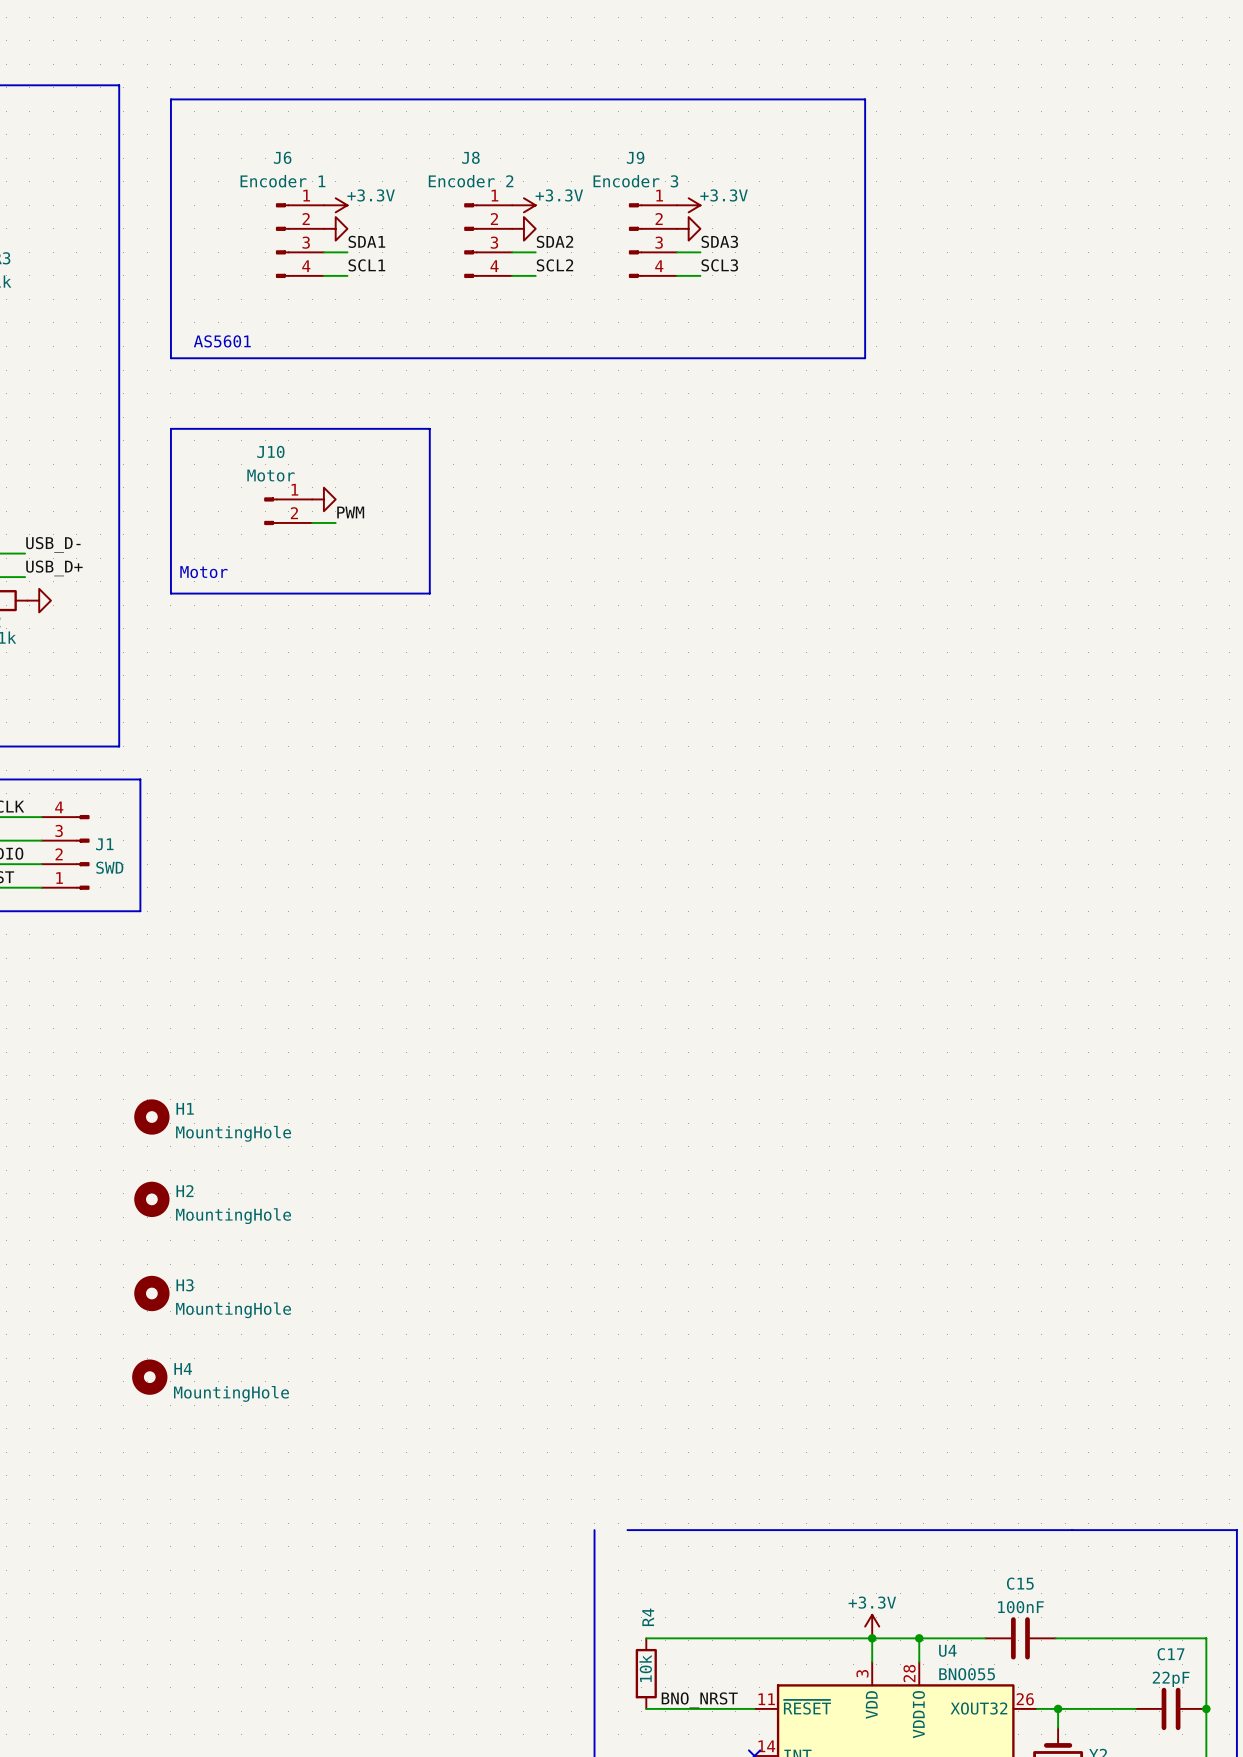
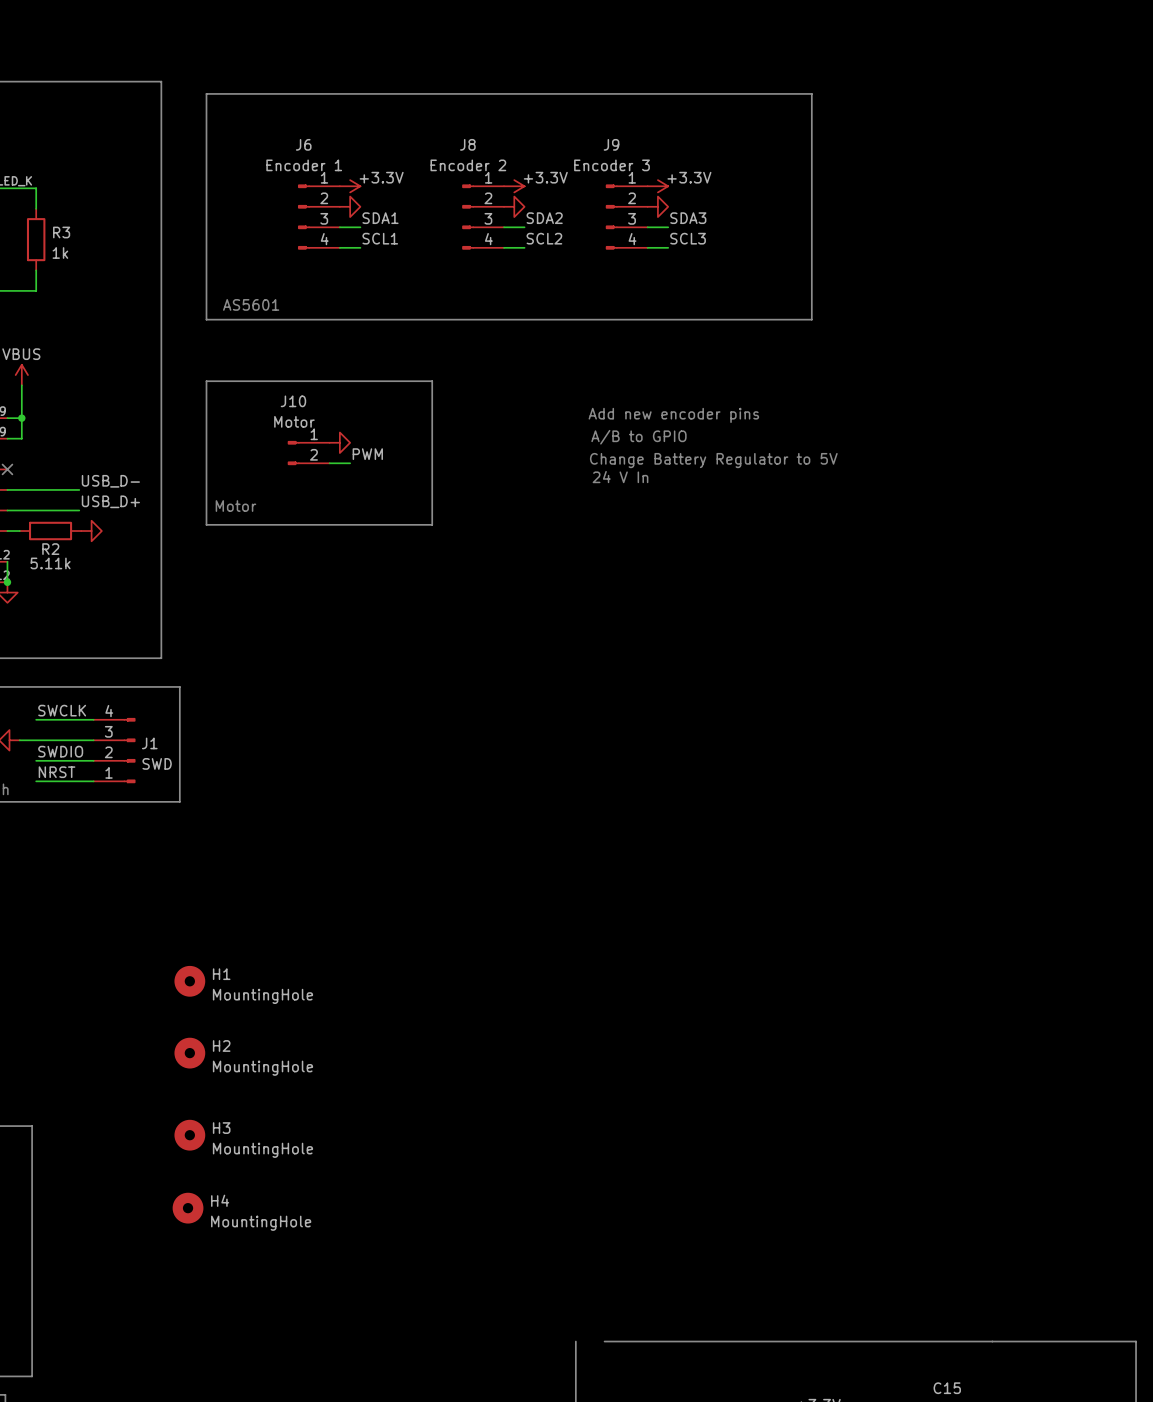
text: none -> Add new encoder pins (673, 415)
text: none -> A/B to GPIO (638, 437)
text: none -> Change Battery Regulator to 5V (713, 460)
text: none -> 24 V In (620, 477)

